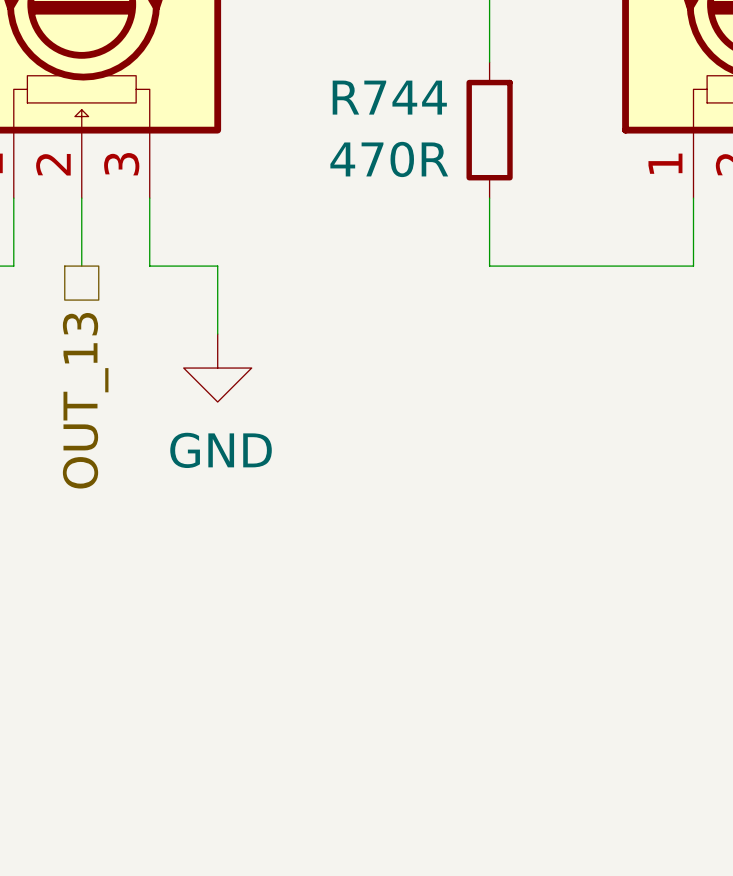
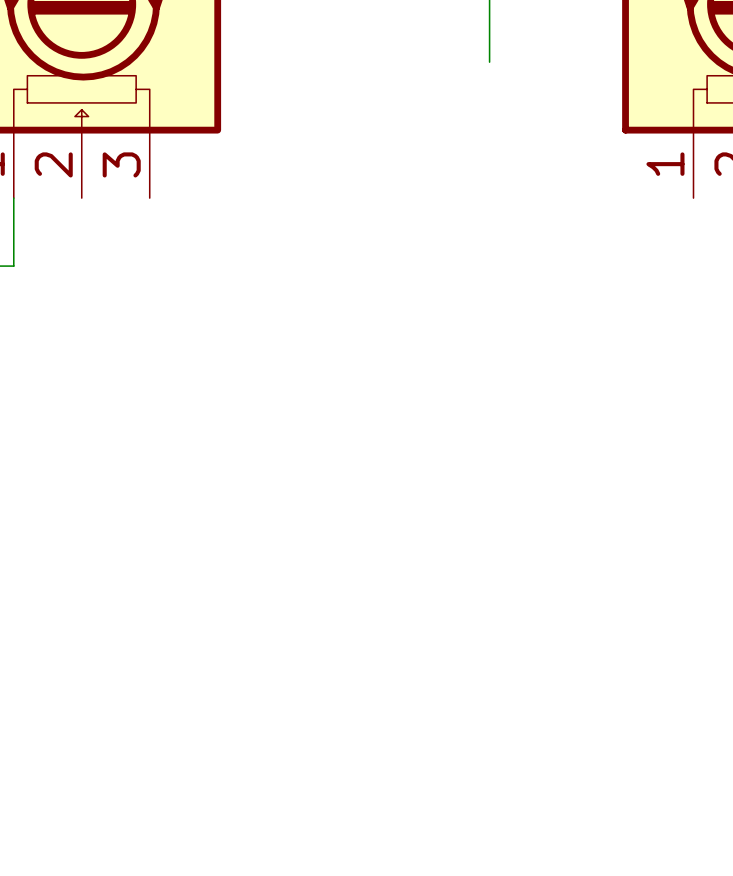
R744: 470R (489, 130) -> none
wire: (81, 198) (81, 266) -> none
wire: (149, 198) (149, 266) (217, 266) (217, 334) -> none
wire: (489, 198) (489, 266) (693, 266) (693, 198) -> none
power symbol: GND (217, 368) -> none
hierarchical label: OUT_13 (85, 400) -> none

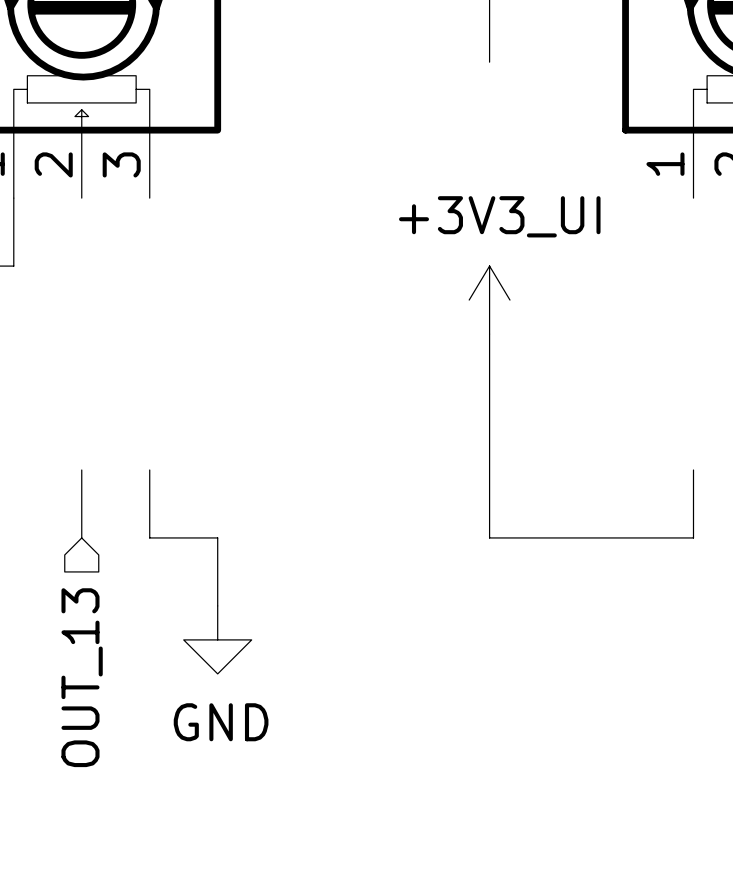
power symbol: none -> +3V3_UI (489, 300)
wire: none -> (489, 334) (489, 537) (693, 537) (693, 469)
wire: none -> (81, 469) (81, 537)
wire: none -> (149, 469) (149, 537) (217, 537) (217, 605)
power symbol: none -> GND (217, 639)
hierarchical label: none -> OUT_13 (82, 677)

